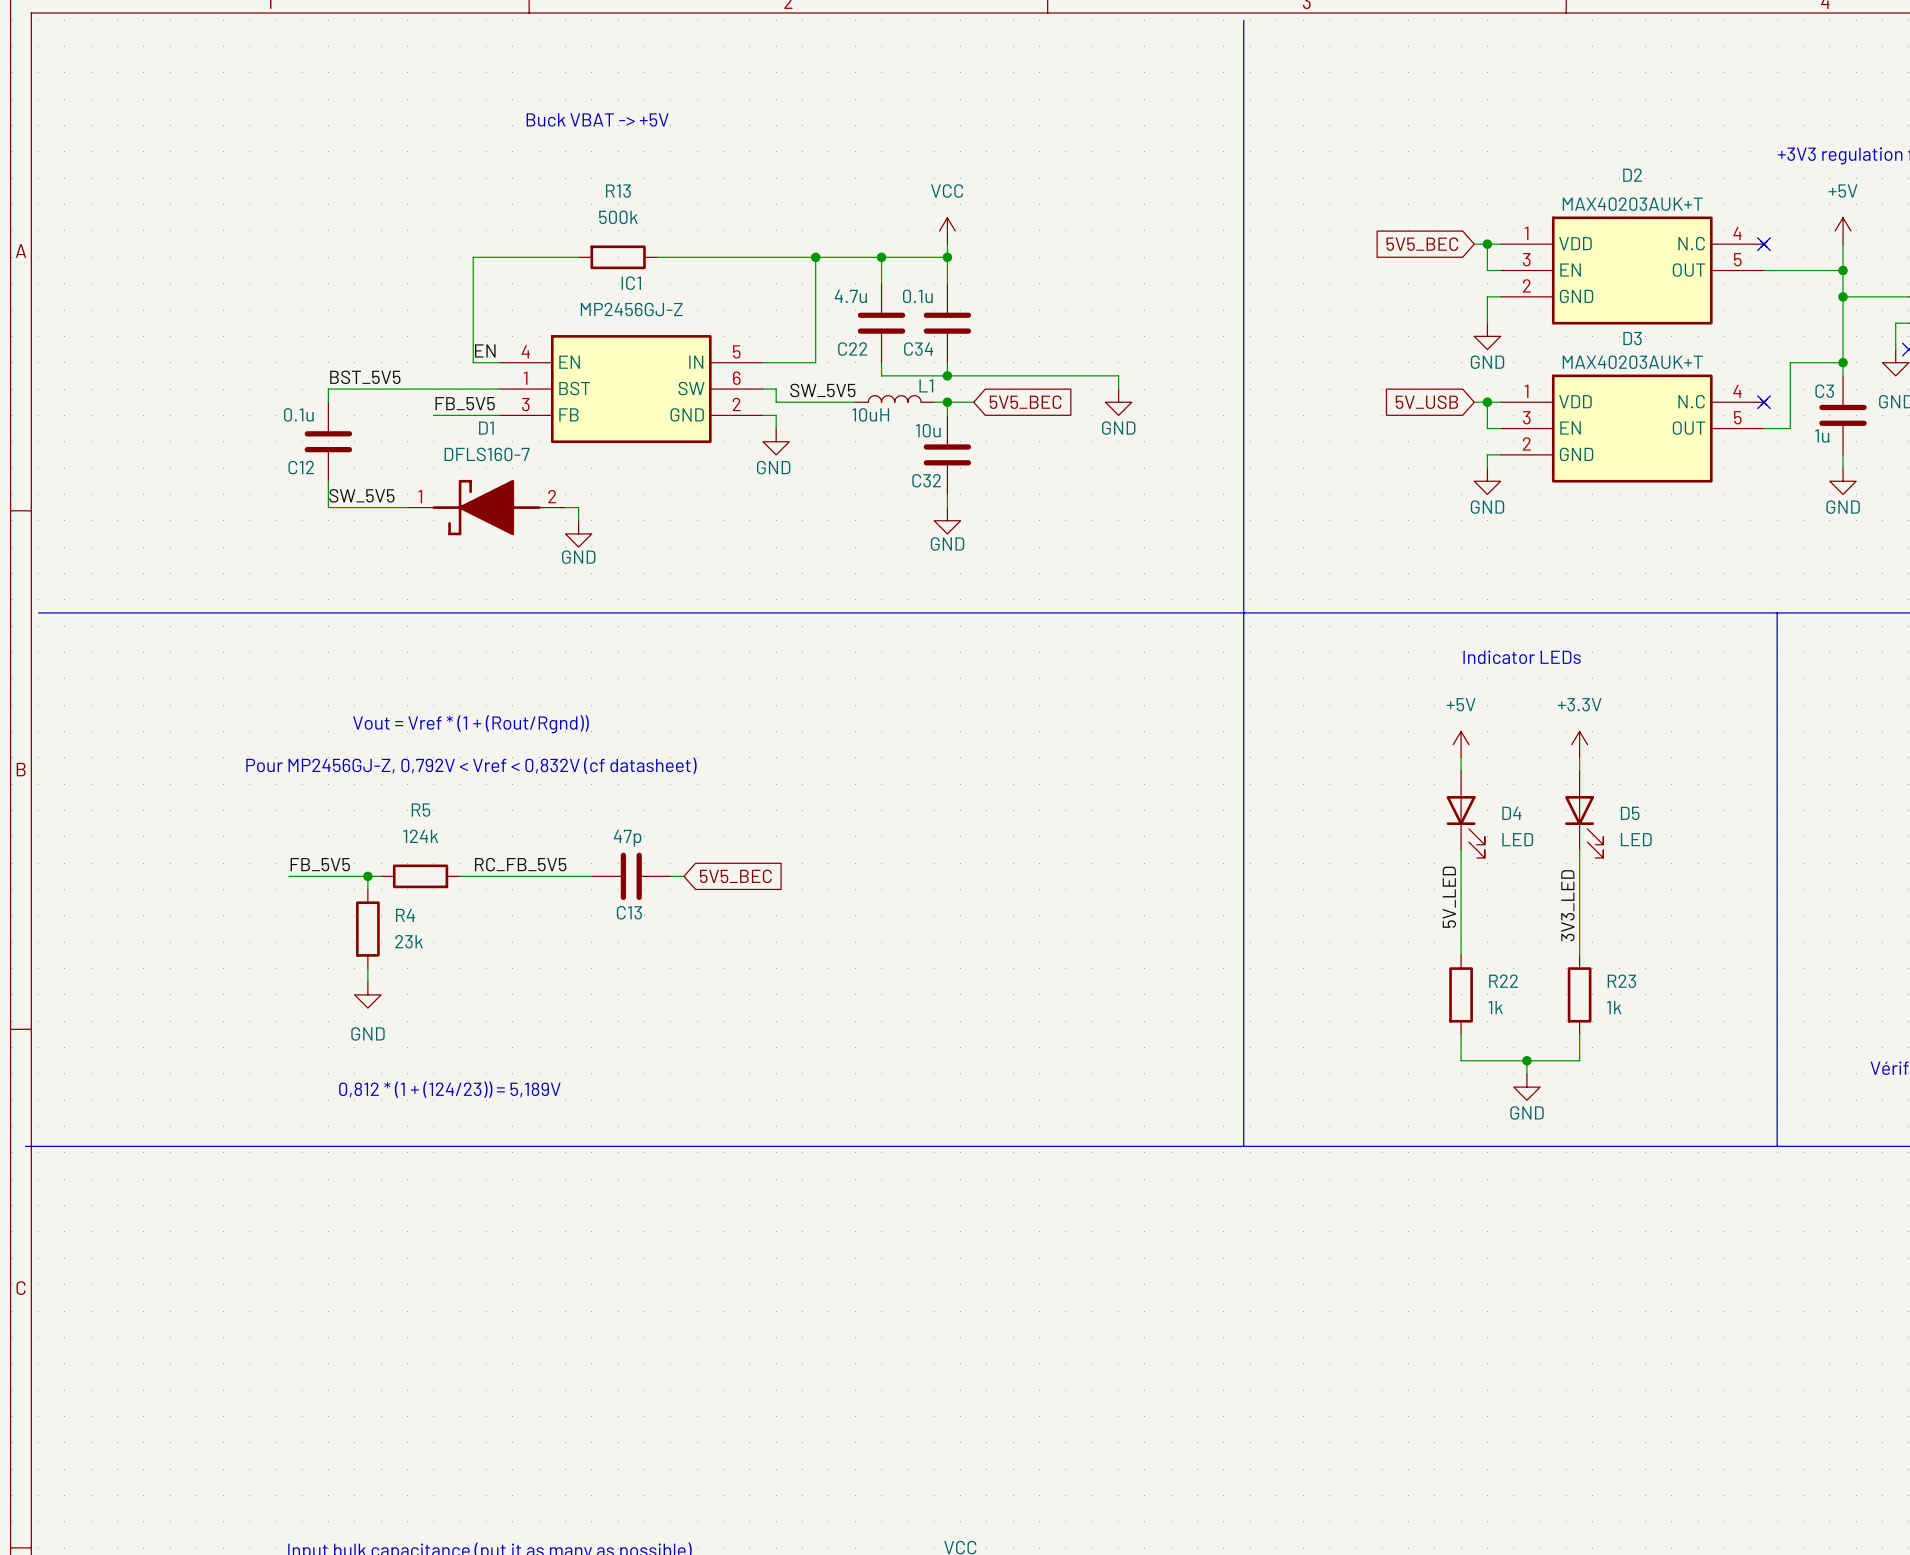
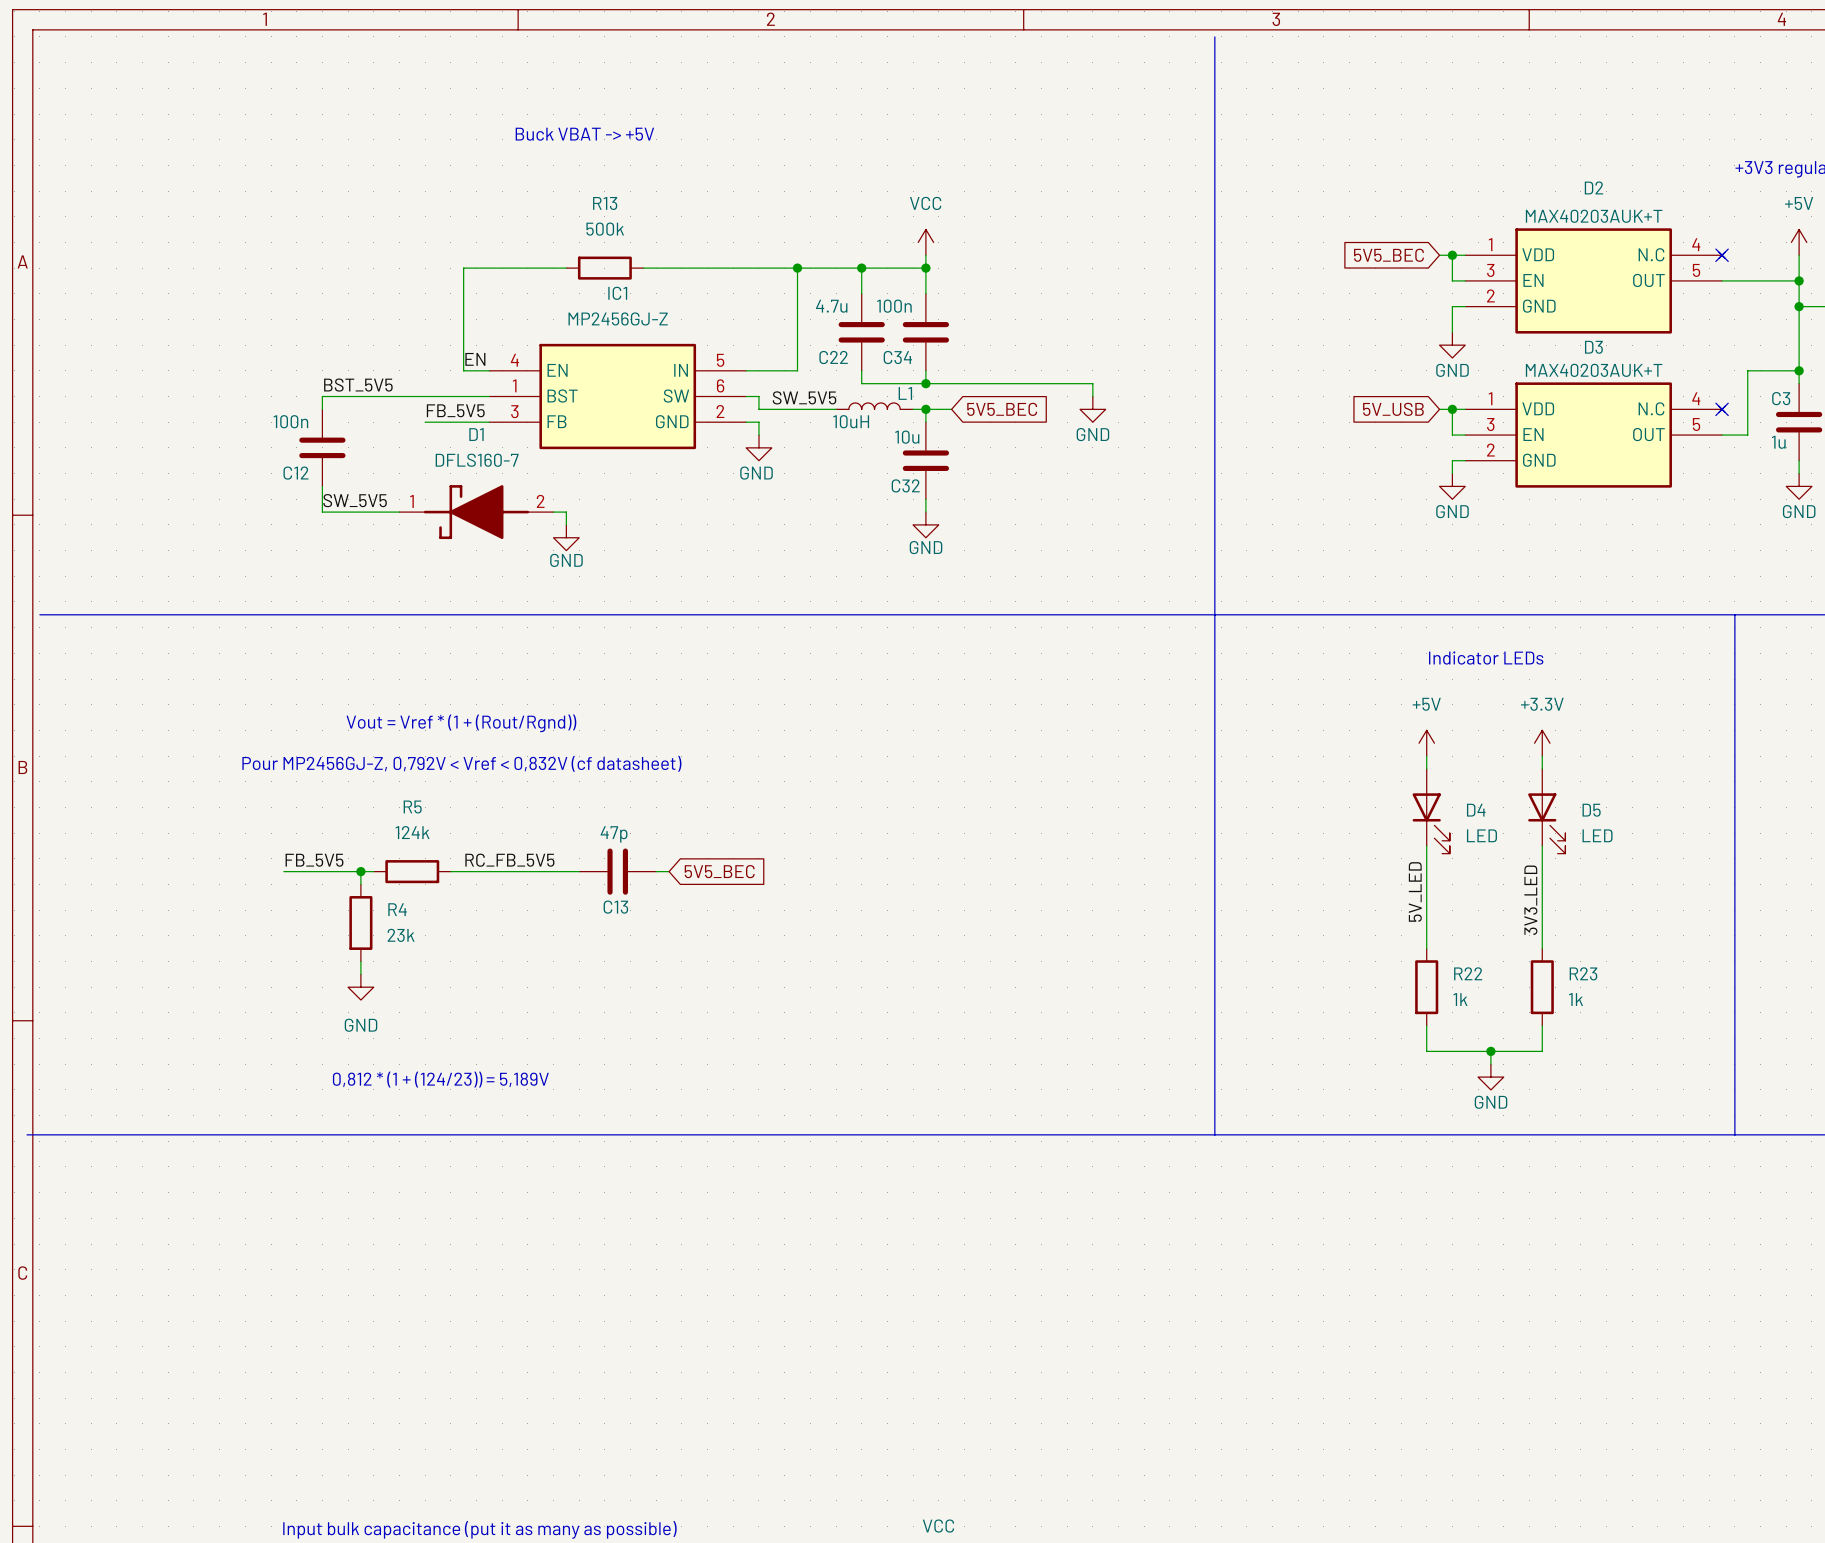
C34 value: 0.1u (917, 296) -> 100n (894, 306)
C12 value: 0.1u (298, 414) -> 100n (290, 421)

